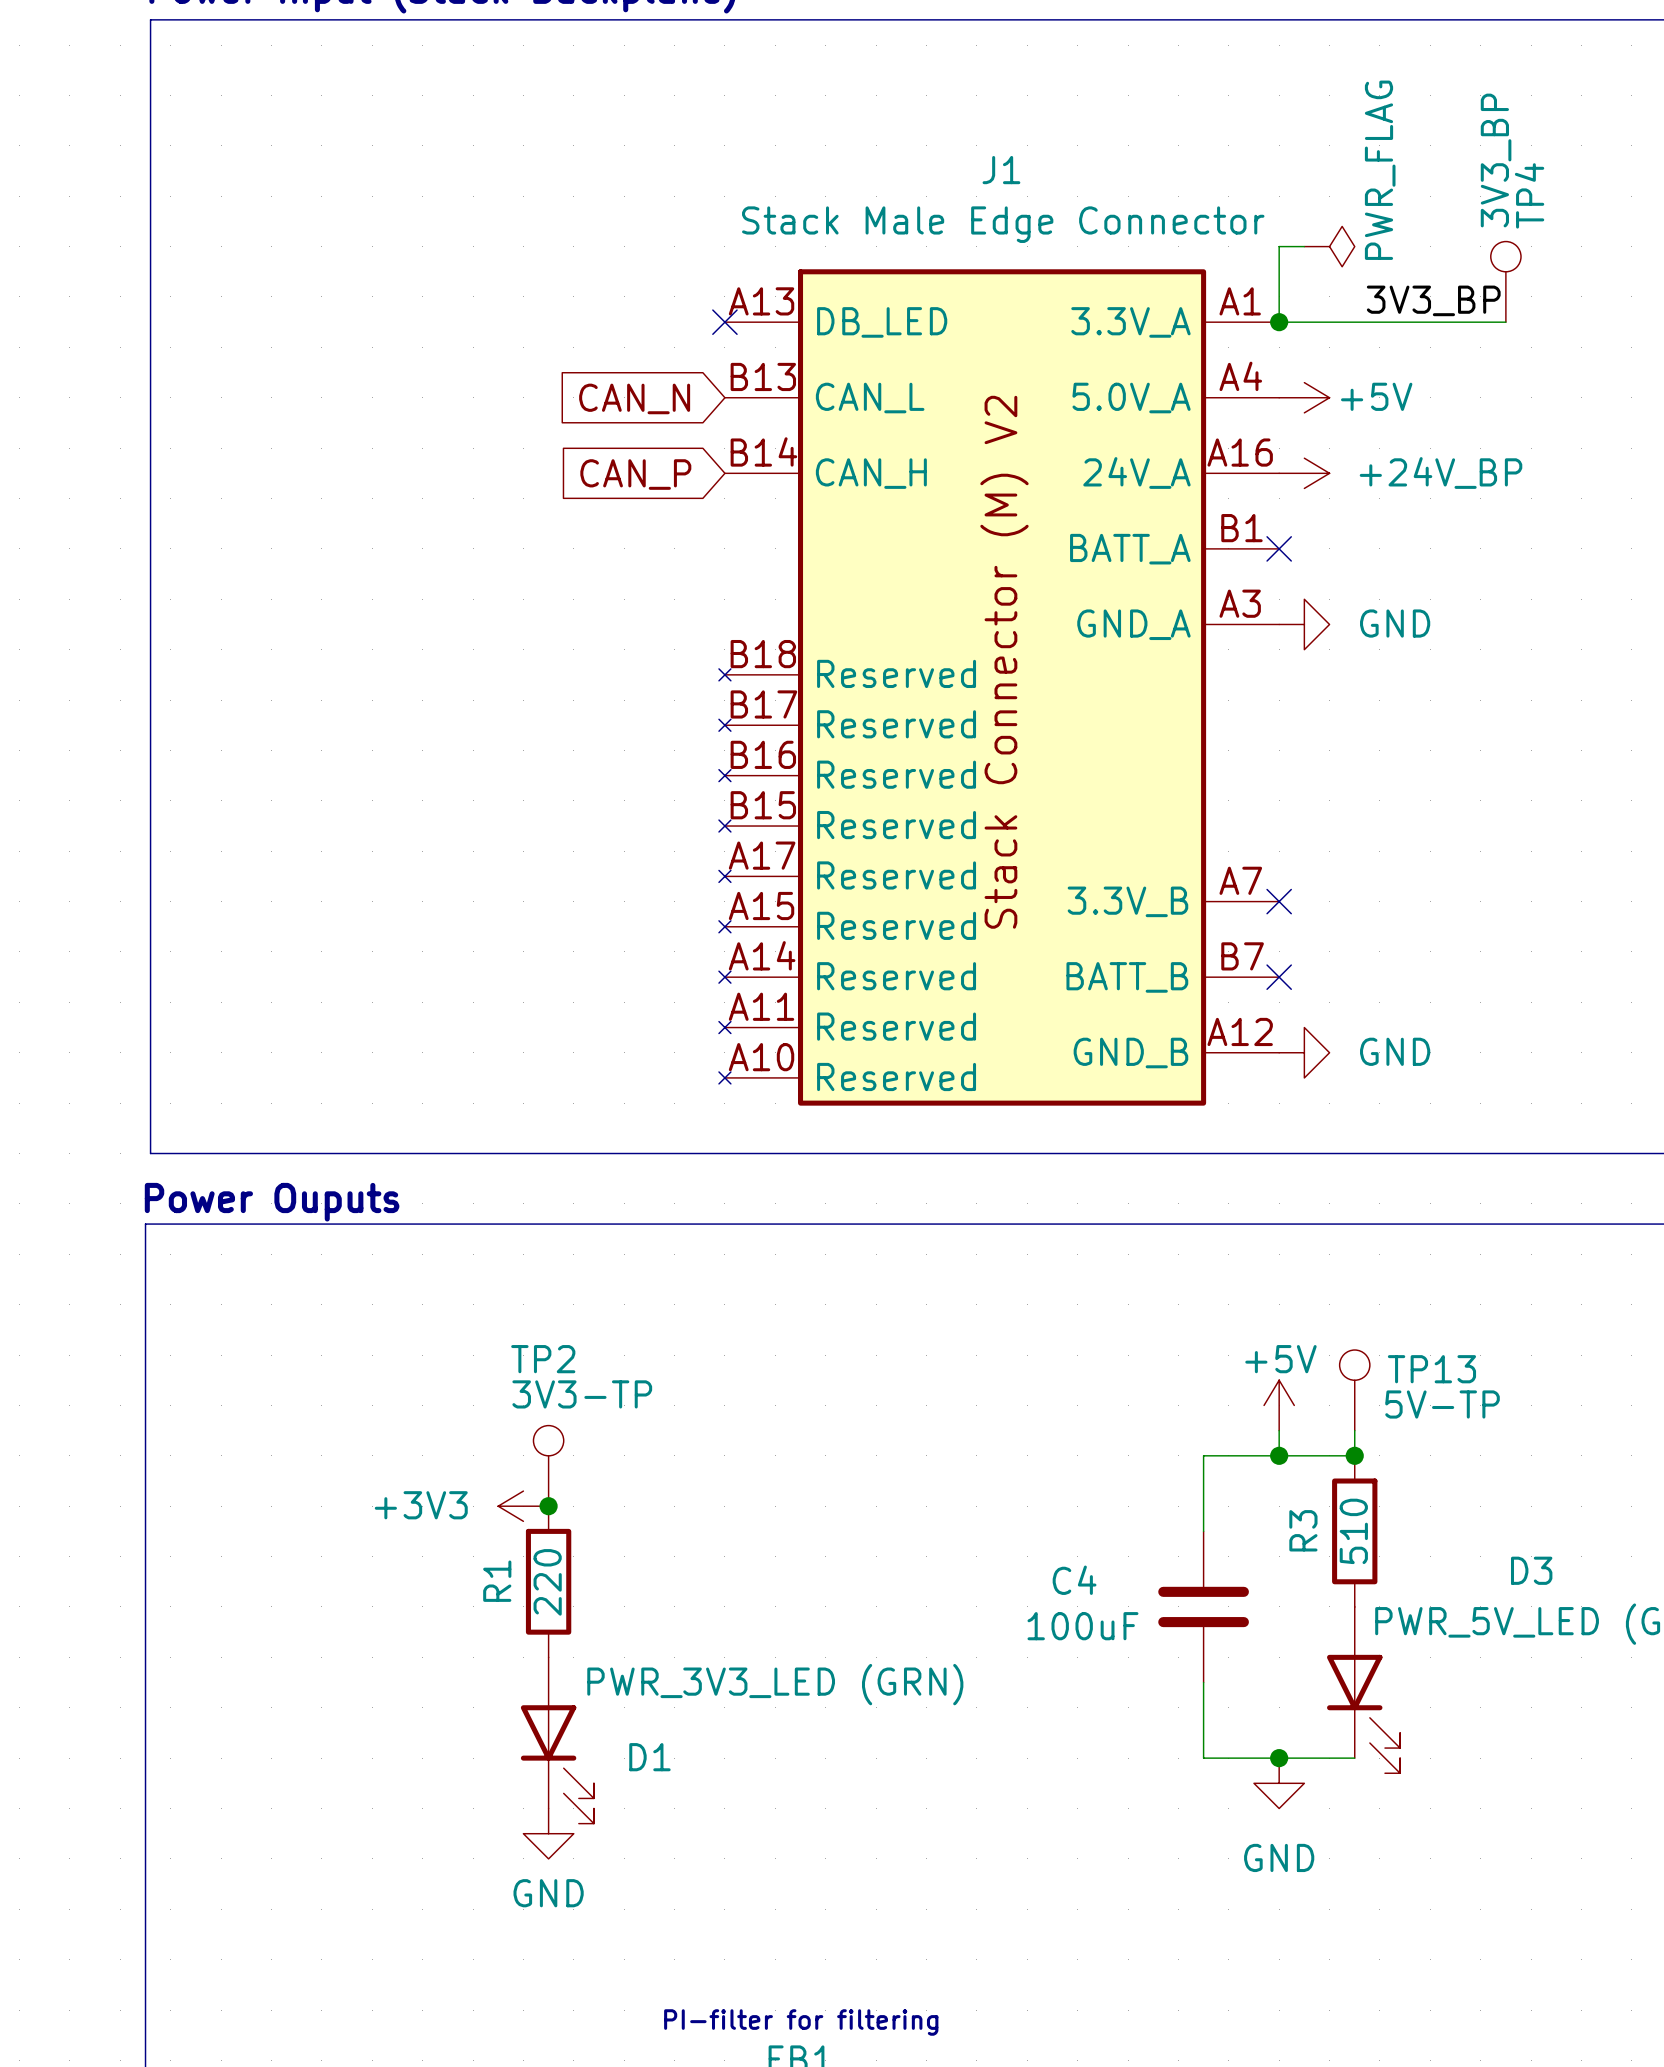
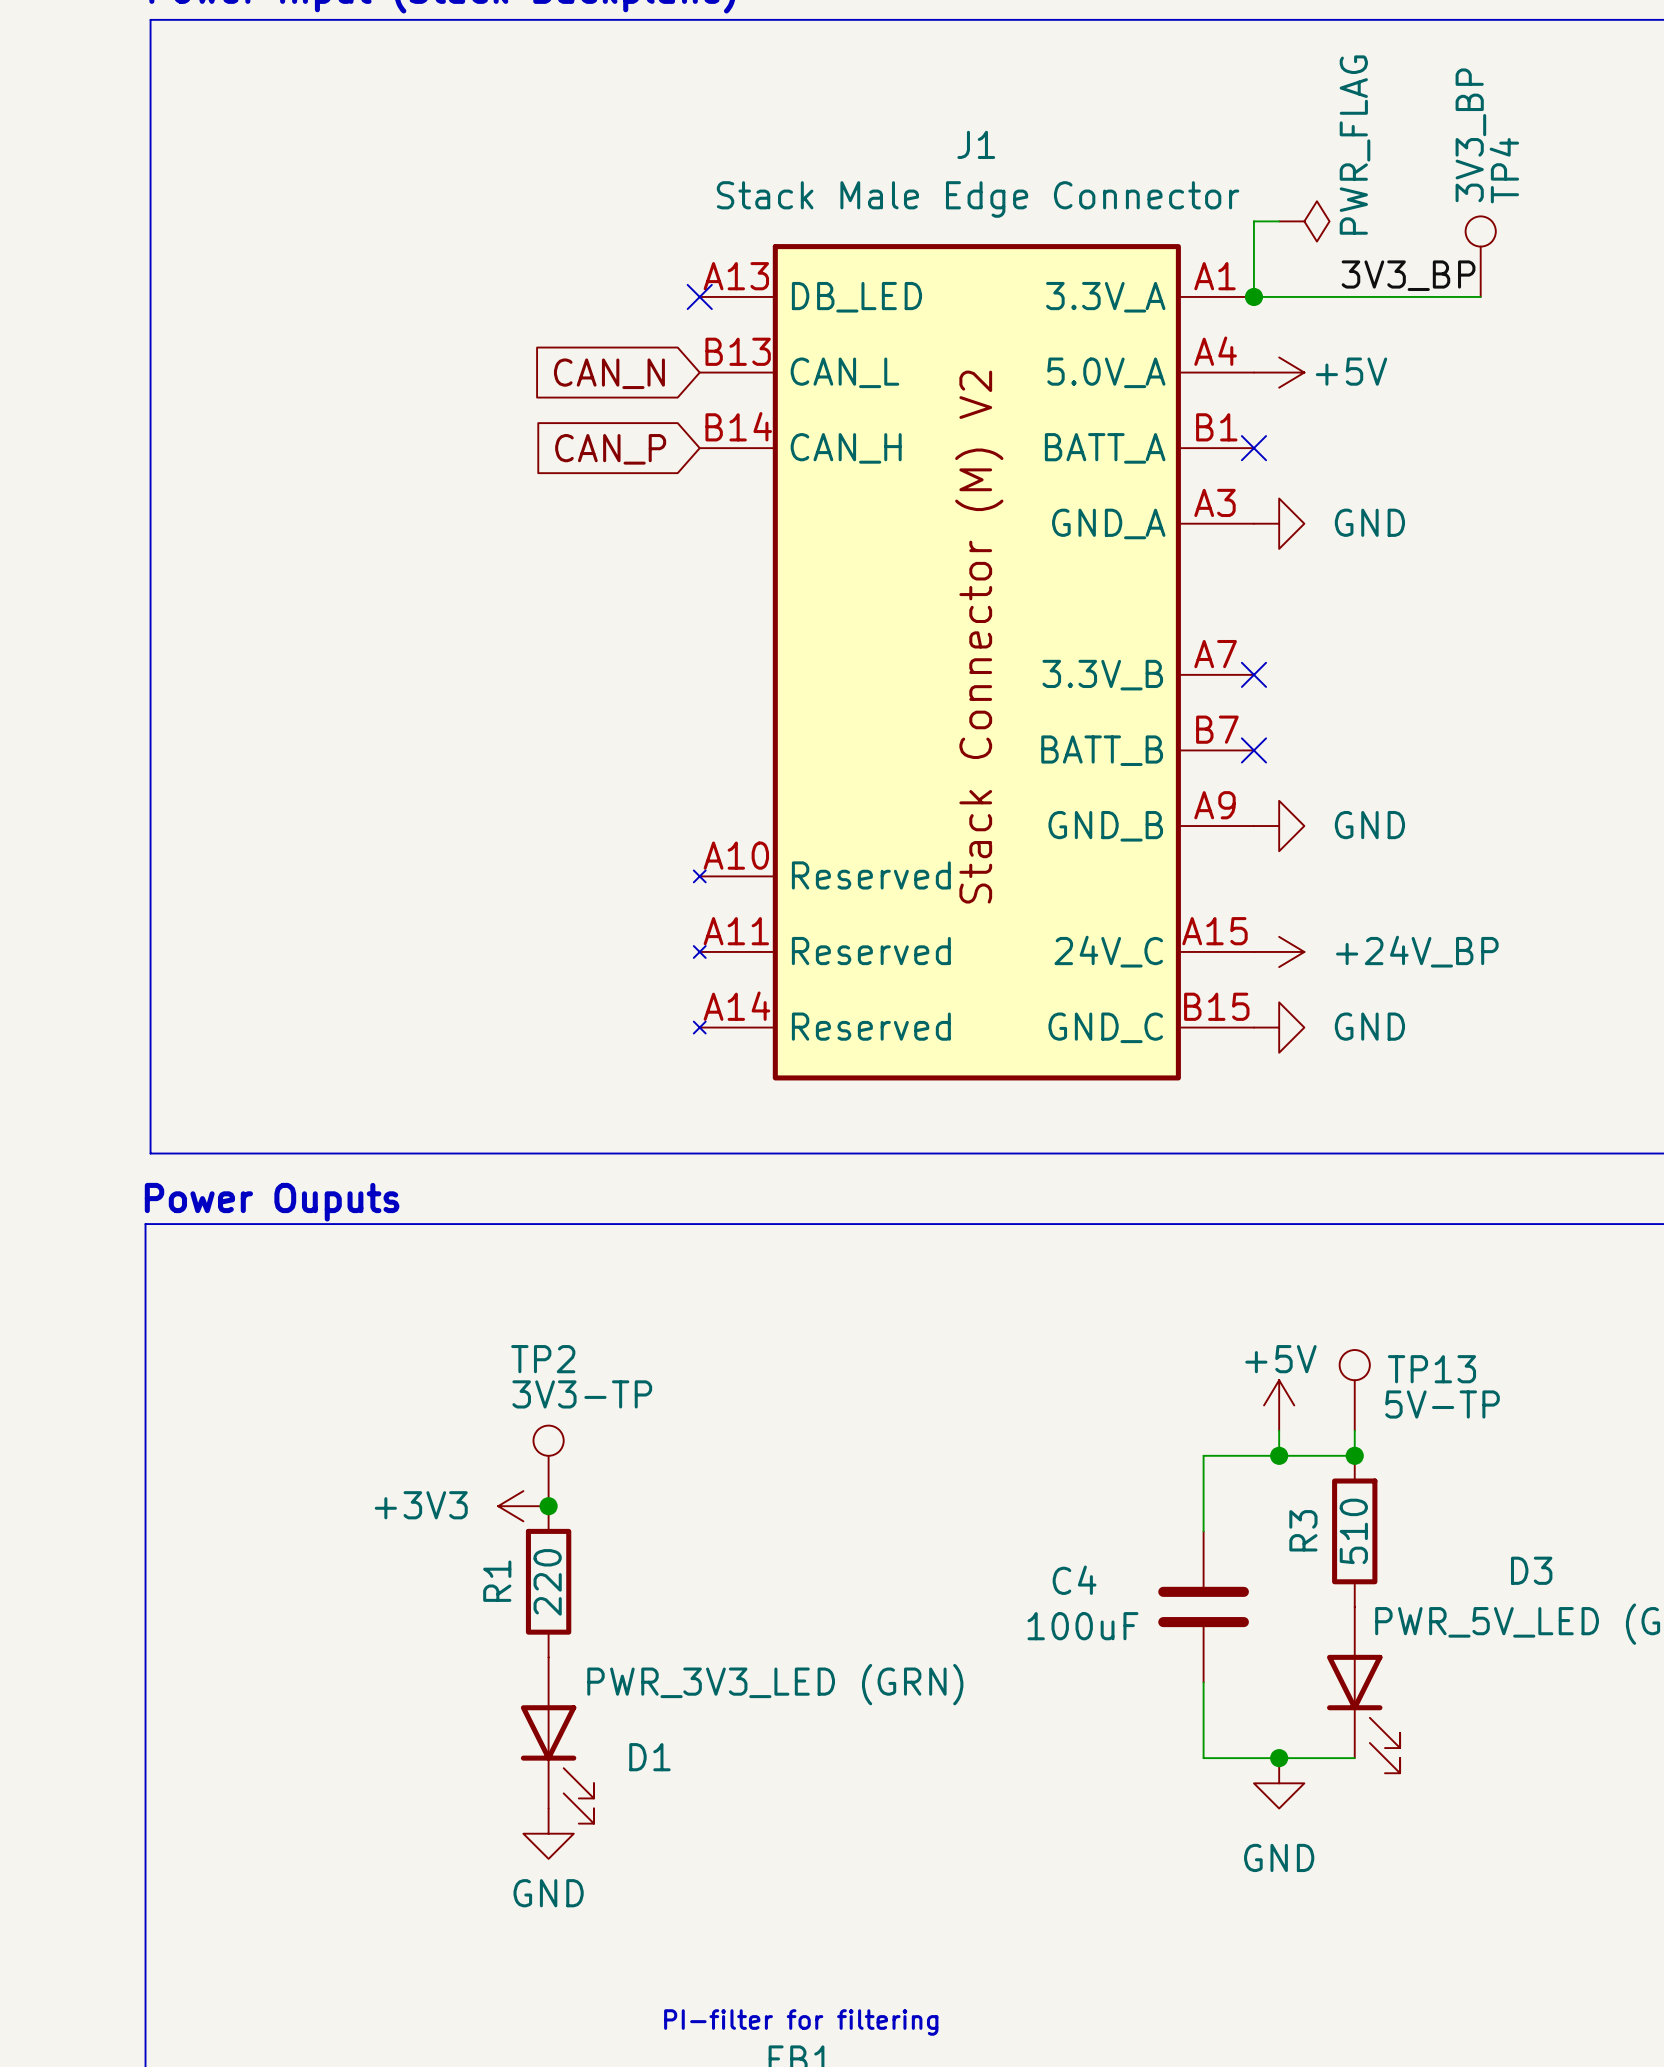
wire: (1304, 246) (1279, 246) (1279, 322) (1505, 322) -> (1279, 221) (1253, 221) (1253, 296) (1480, 296)
power symbol position: PWR_FLAG (1329, 246) -> PWR_FLAG (1304, 221)
J1 symbol: [718, 269, 1280, 1106] -> [693, 244, 1254, 1081]
TP4 position: (1505, 281) -> (1480, 256)
label position: 3V3_BP (1433, 300) -> 3V3_BP (1408, 275)
no-connect mark position: (724, 322) -> (699, 296)
junction position: (1279, 322) -> (1253, 296)
power symbol position: +5V (1304, 397) -> +5V (1279, 372)
global label position: CAN_N (634, 398) -> CAN_N (609, 373)
no-connect mark: none -> (1253, 448)
power symbol text position: +24V_BP (1440, 472) -> +24V_BP (1417, 951)
power symbol position: +24V_BP (1304, 473) -> +24V_BP (1279, 951)
global label position: CAN_P (635, 474) -> CAN_P (610, 449)
power symbol: none -> GND (1279, 523)
no-connect mark: (1279, 548) -> none
power symbol: GND (1304, 624) -> none
no-connect mark: none -> (1253, 674)
no-connect mark: none -> (1253, 750)
power symbol: none -> GND (1279, 826)
no-connect mark: (1279, 901) -> none
no-connect mark: (1279, 977) -> none
power symbol position: GND (1304, 1052) -> GND (1279, 1027)

